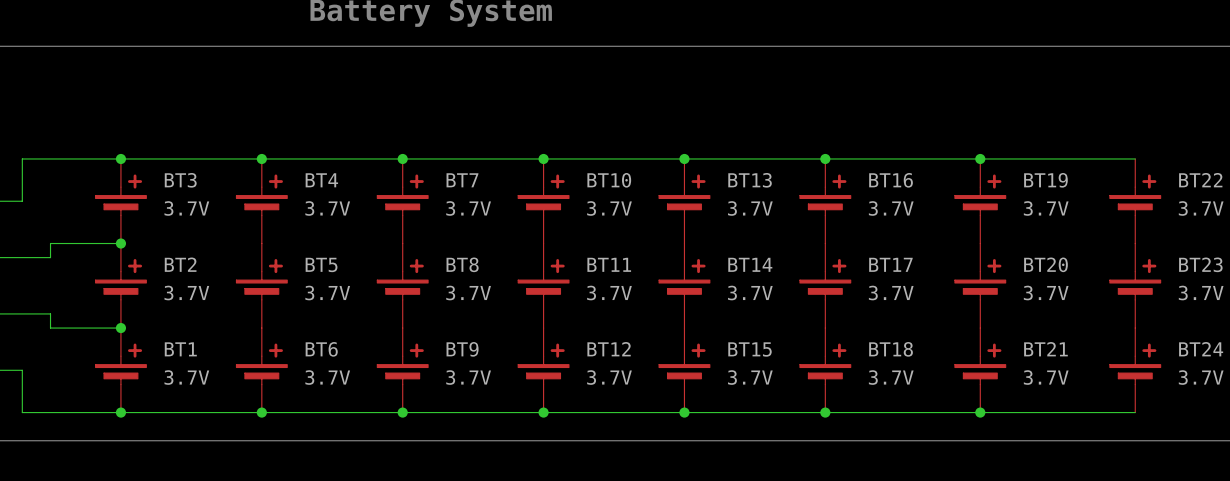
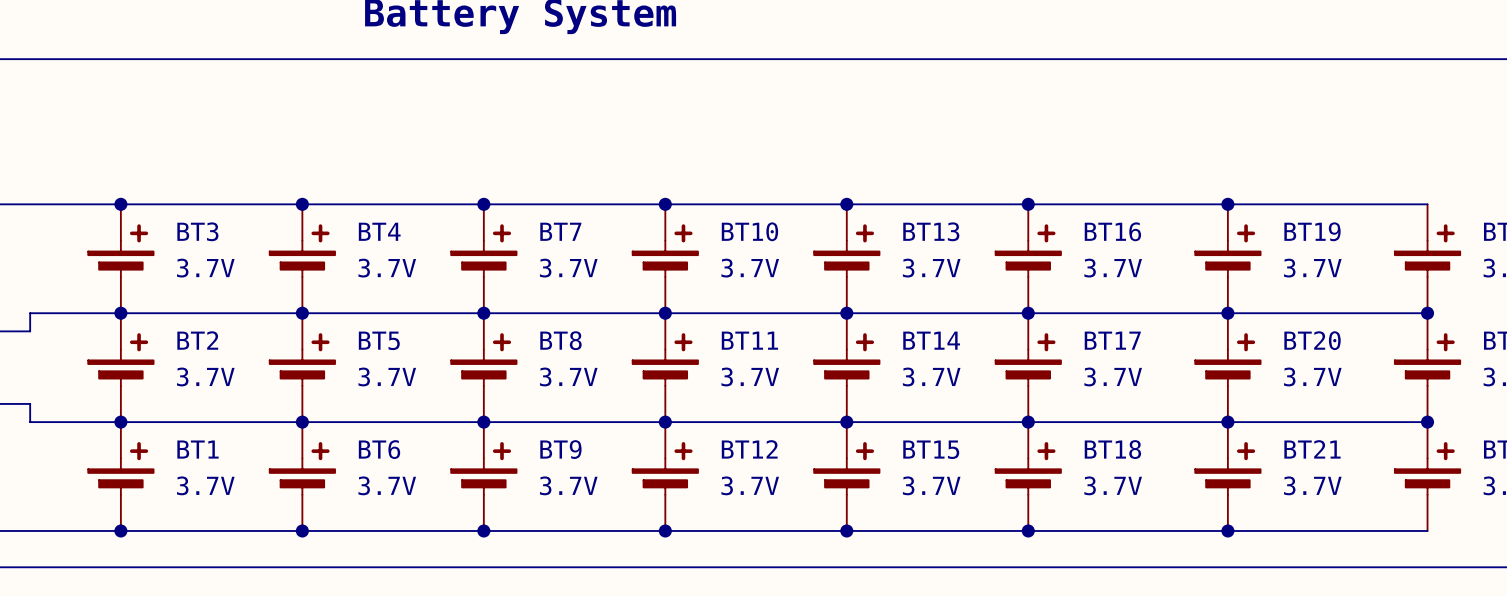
wire: none -> (120, 313) (1427, 313)
junction: none -> (302, 313)
junction: none -> (483, 313)
junction: none -> (665, 313)
junction: none -> (846, 313)
junction: none -> (1028, 313)
junction: none -> (1227, 313)
junction: none -> (1427, 313)
wire: none -> (120, 422) (1427, 422)
junction: none -> (302, 422)
junction: none -> (483, 422)
junction: none -> (665, 422)
junction: none -> (846, 422)
junction: none -> (1028, 422)
junction: none -> (1227, 422)
junction: none -> (1427, 422)

